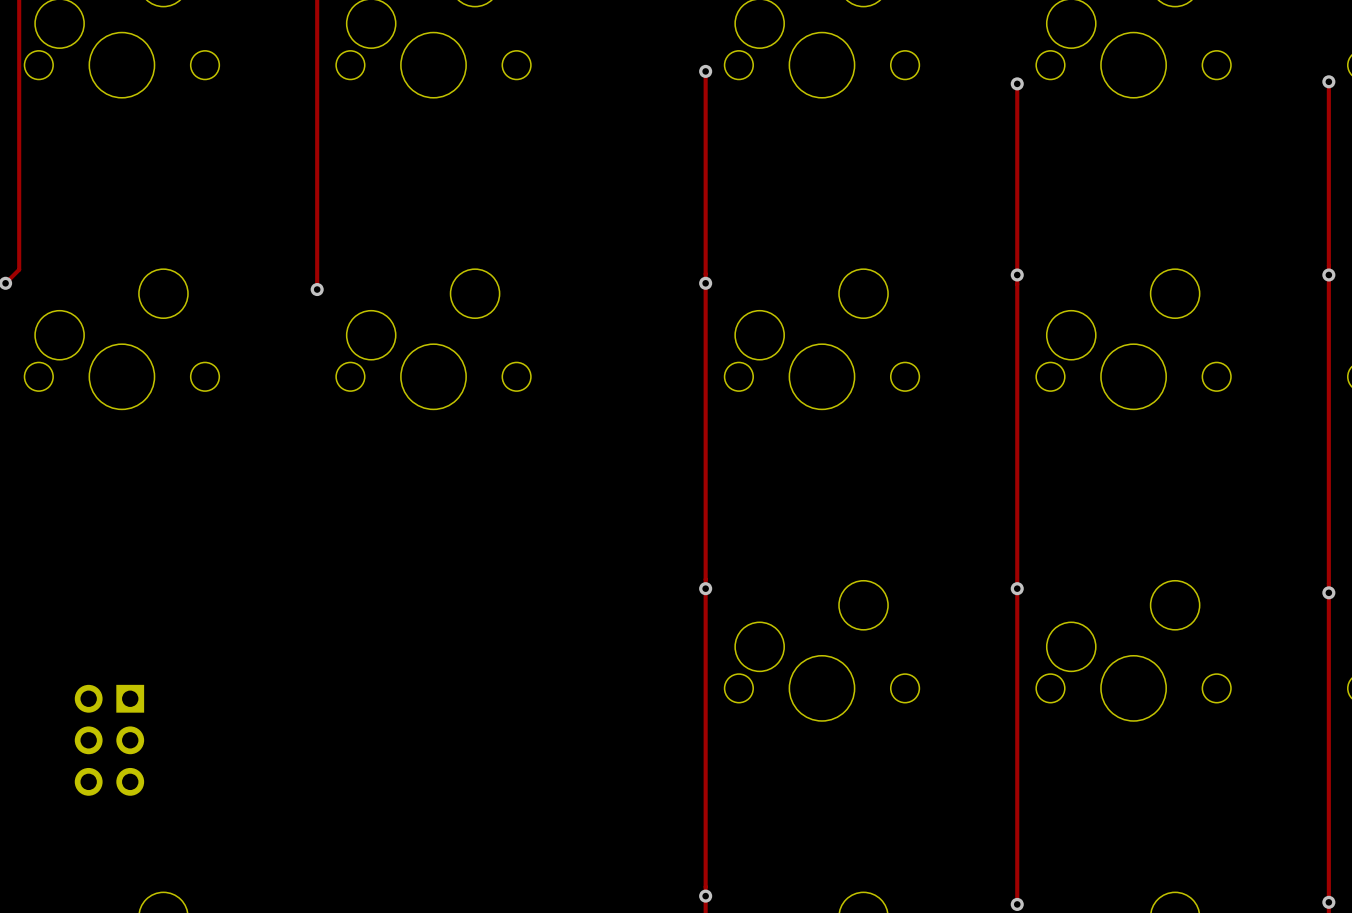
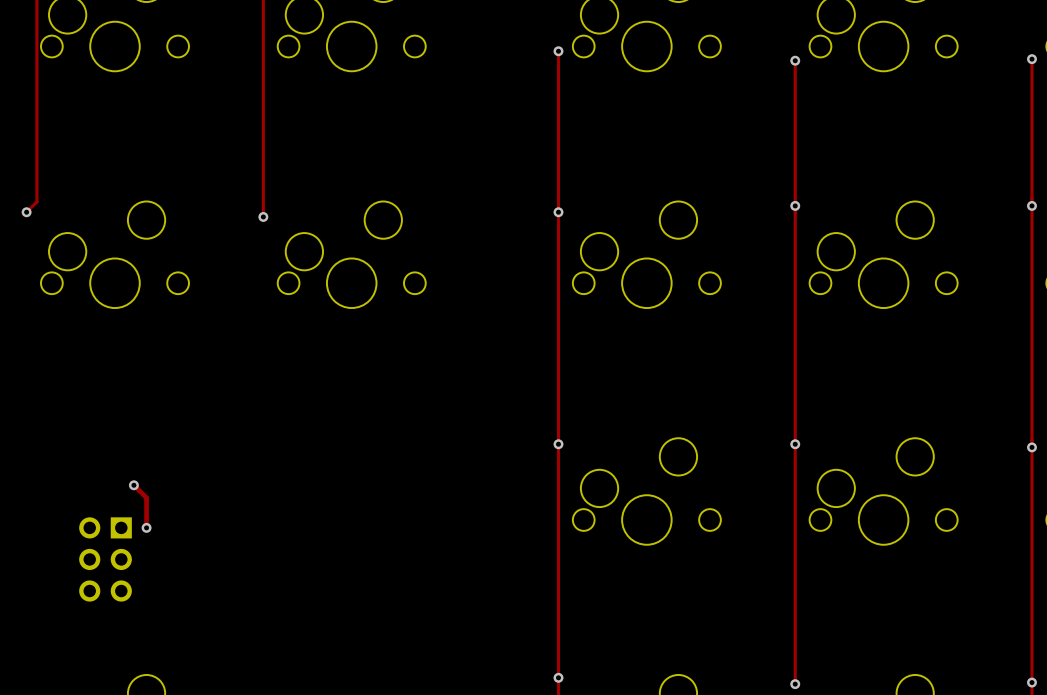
track: none -> (133, 485) (146, 497) (146, 527)
via: none -> (133, 485)
via: none -> (146, 527)

